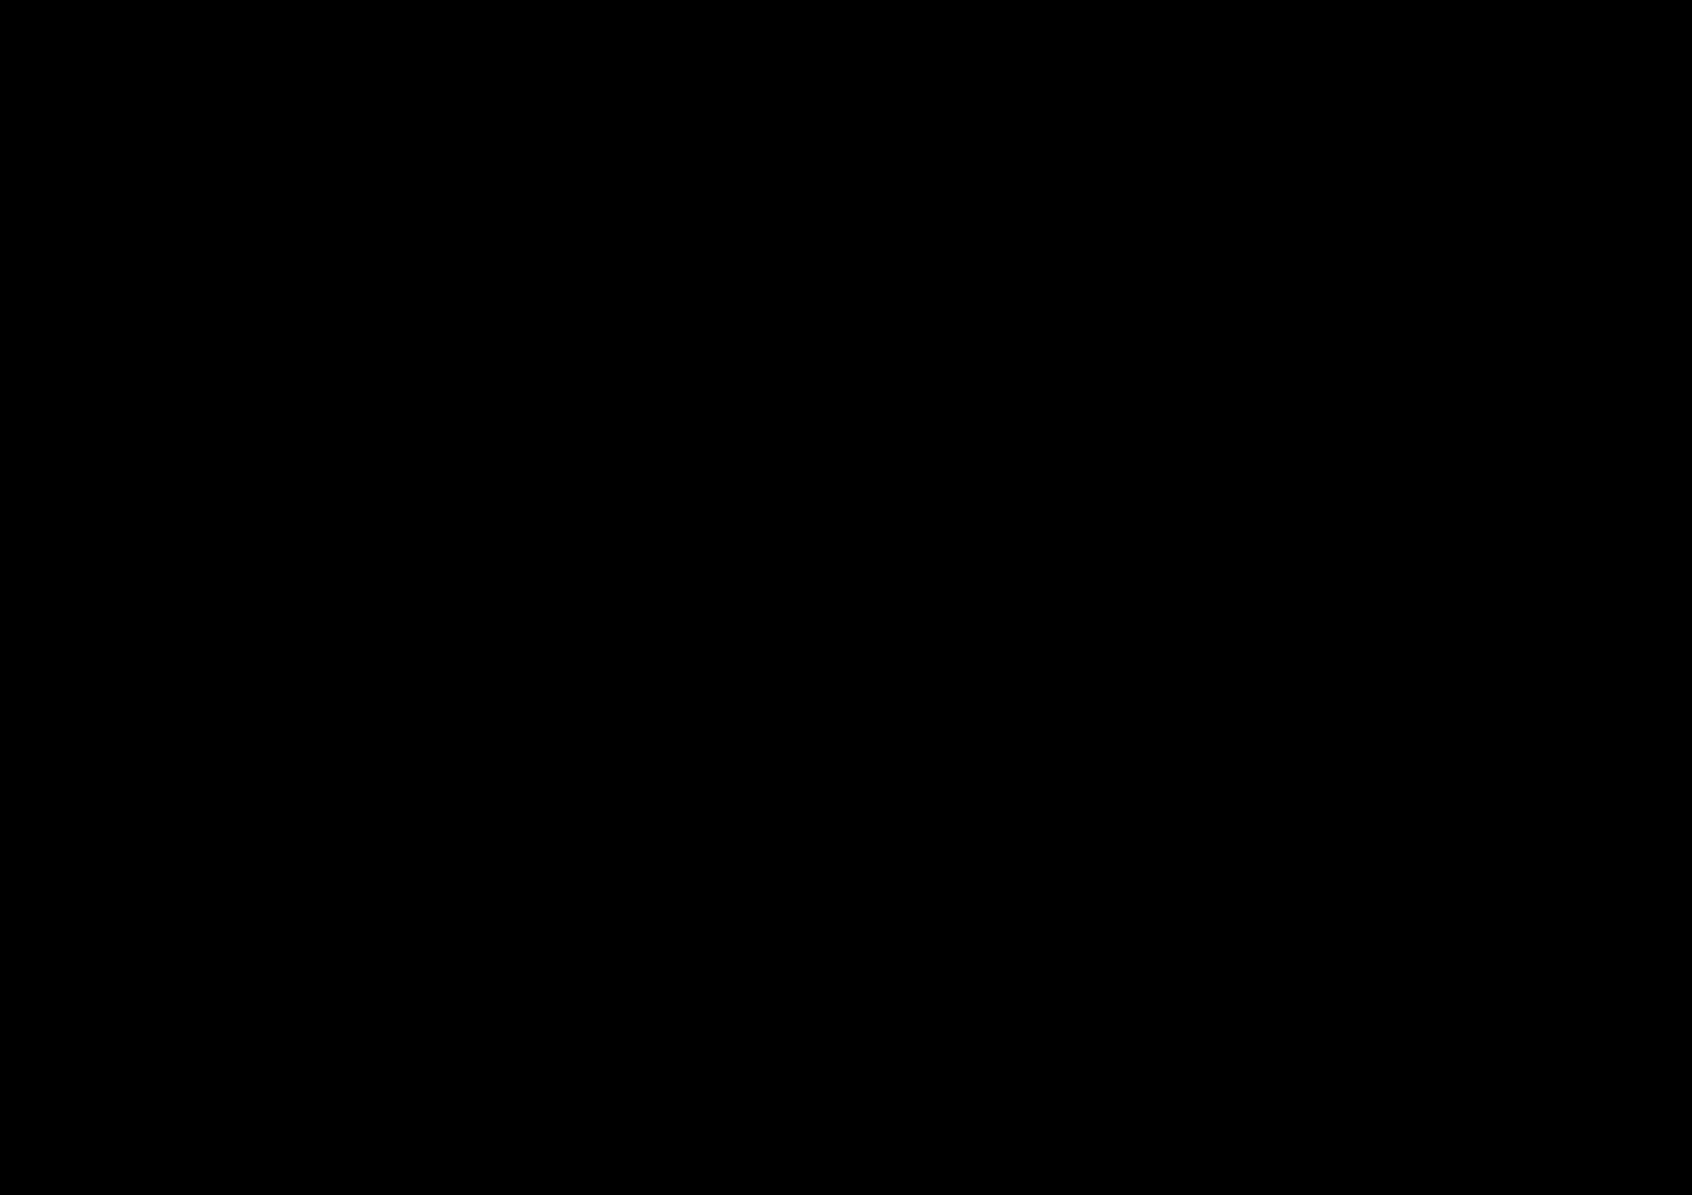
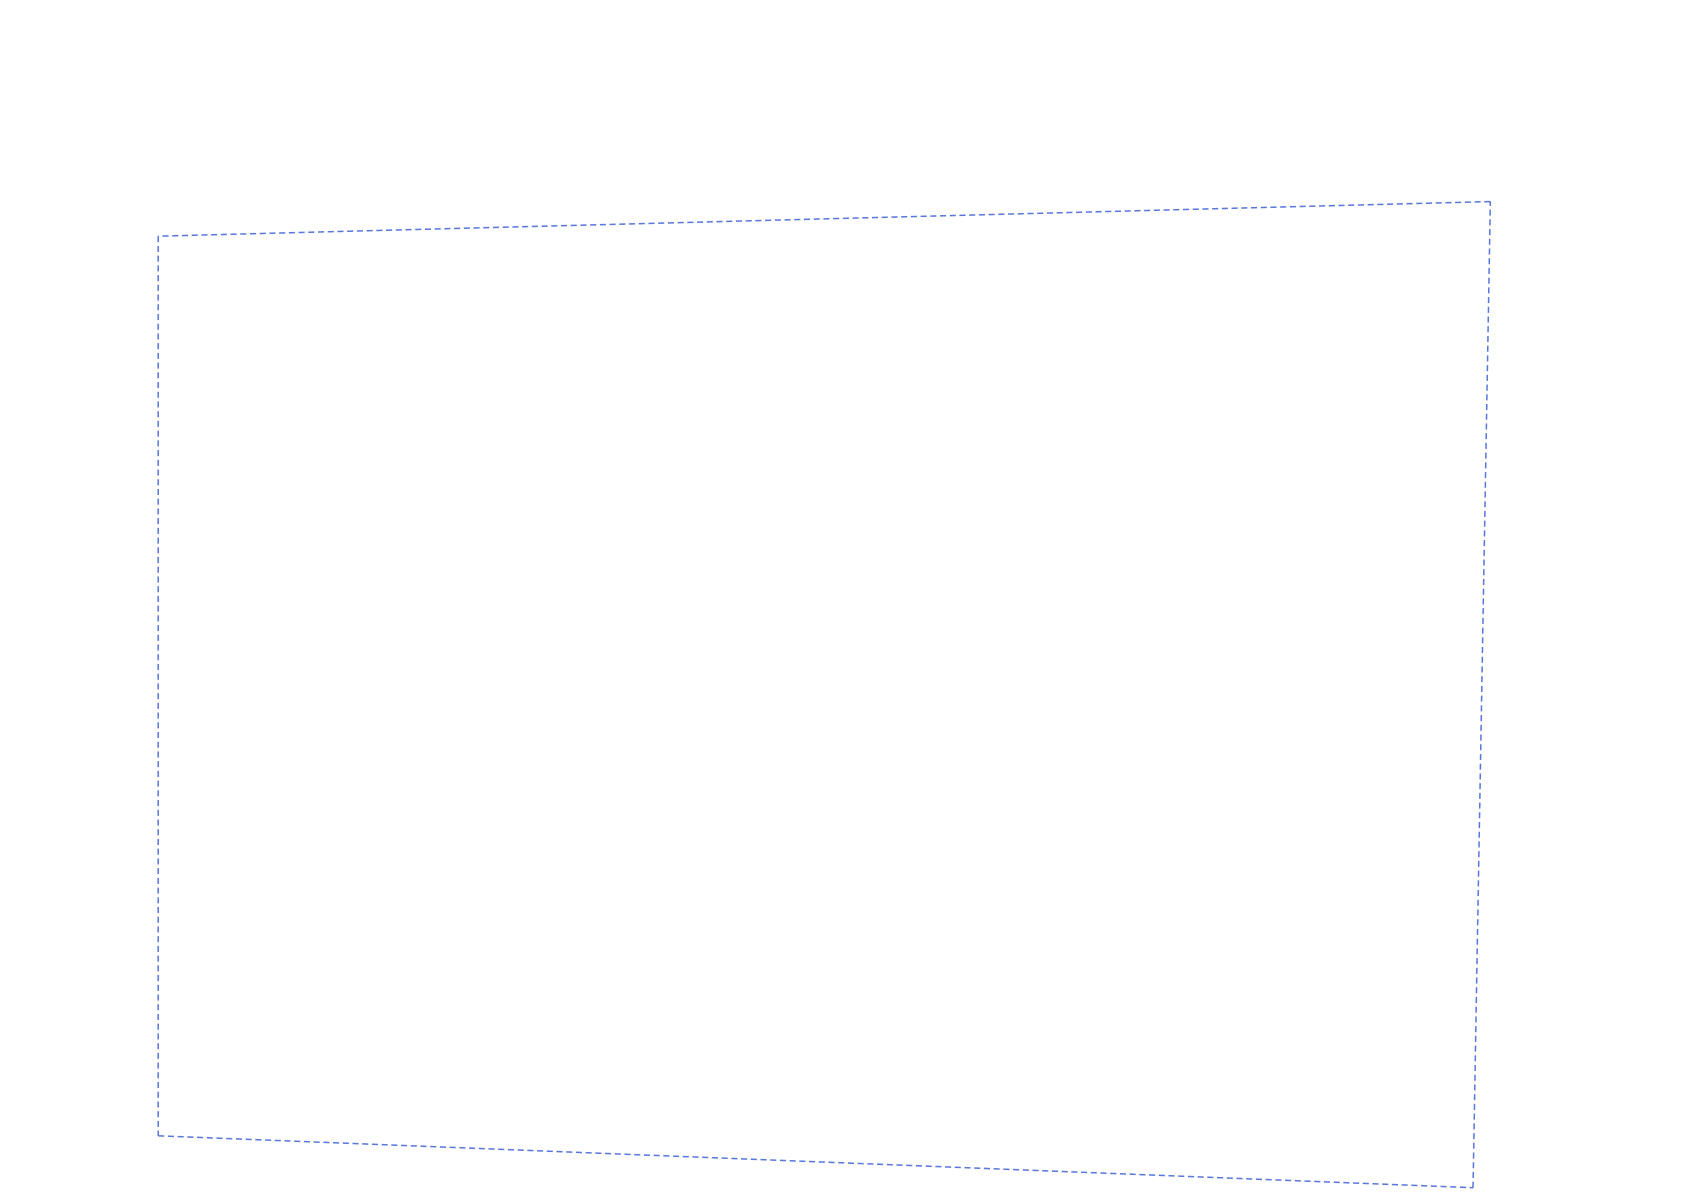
bottom zone outline: none -> (1490, 201) (1473, 1187) (158, 1135) (158, 236) (1490, 201)

